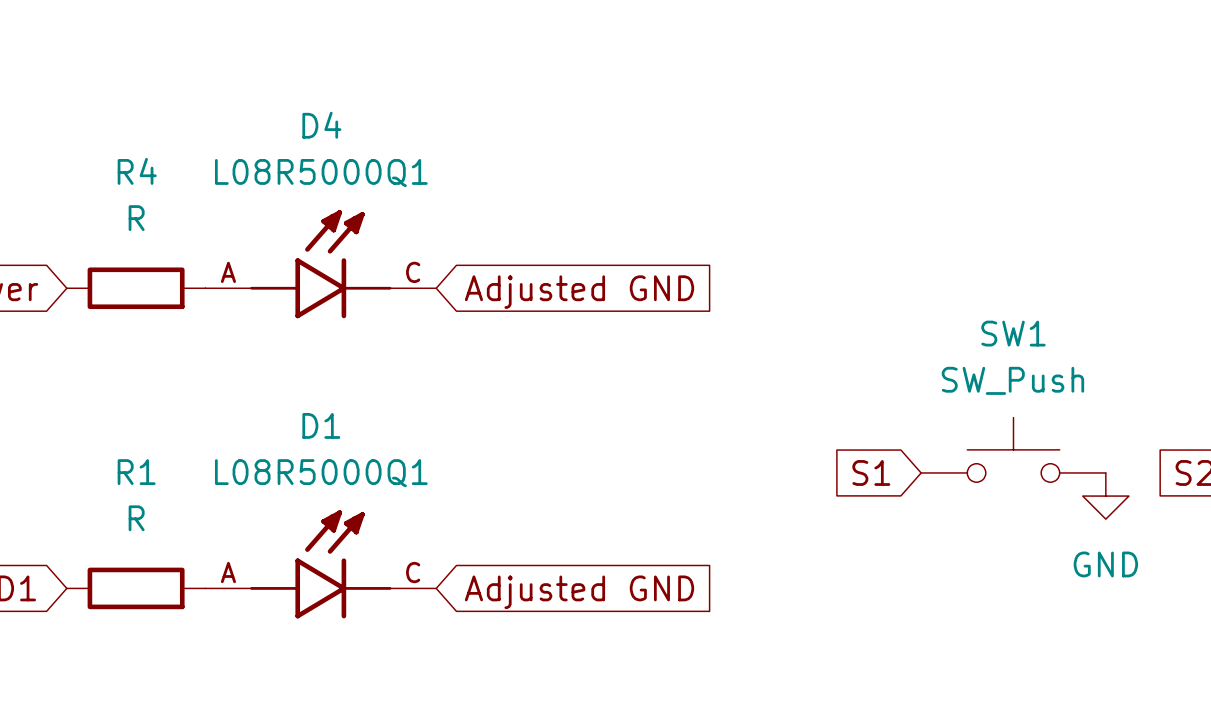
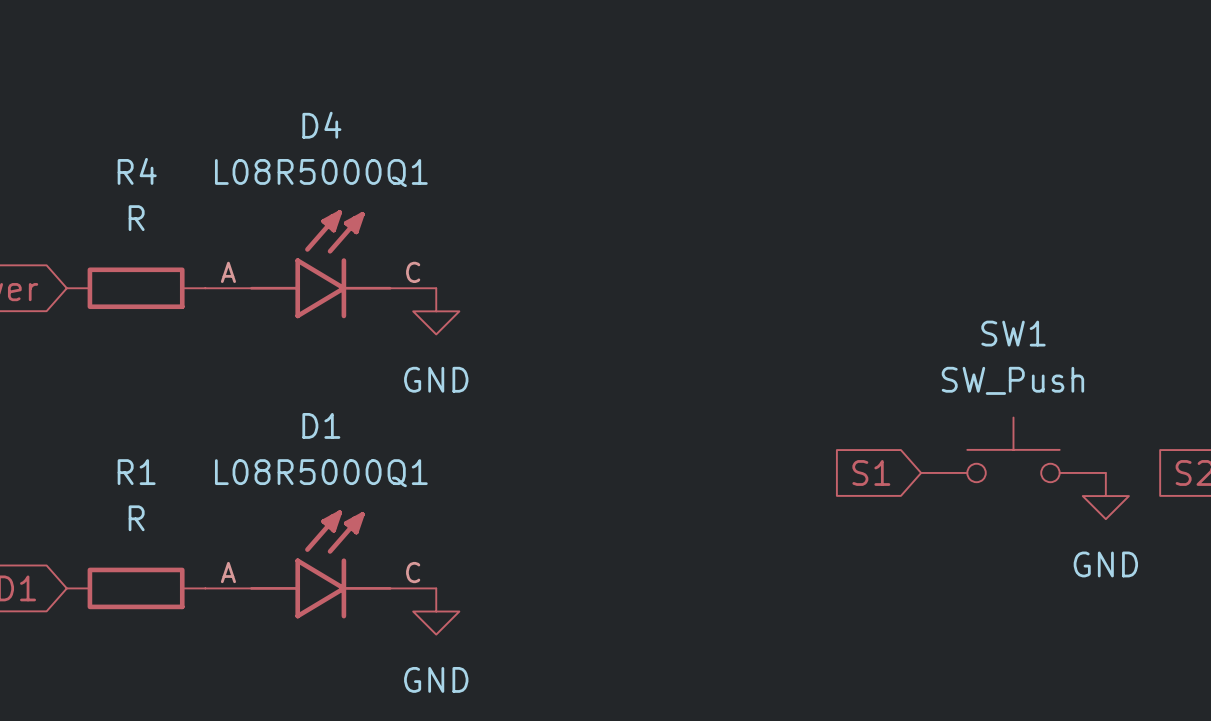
global label: Adjusted GND (579, 292) -> none
power symbol: none -> GND (436, 311)
global label: Adjusted GND (579, 592) -> none
power symbol: none -> GND (436, 611)

